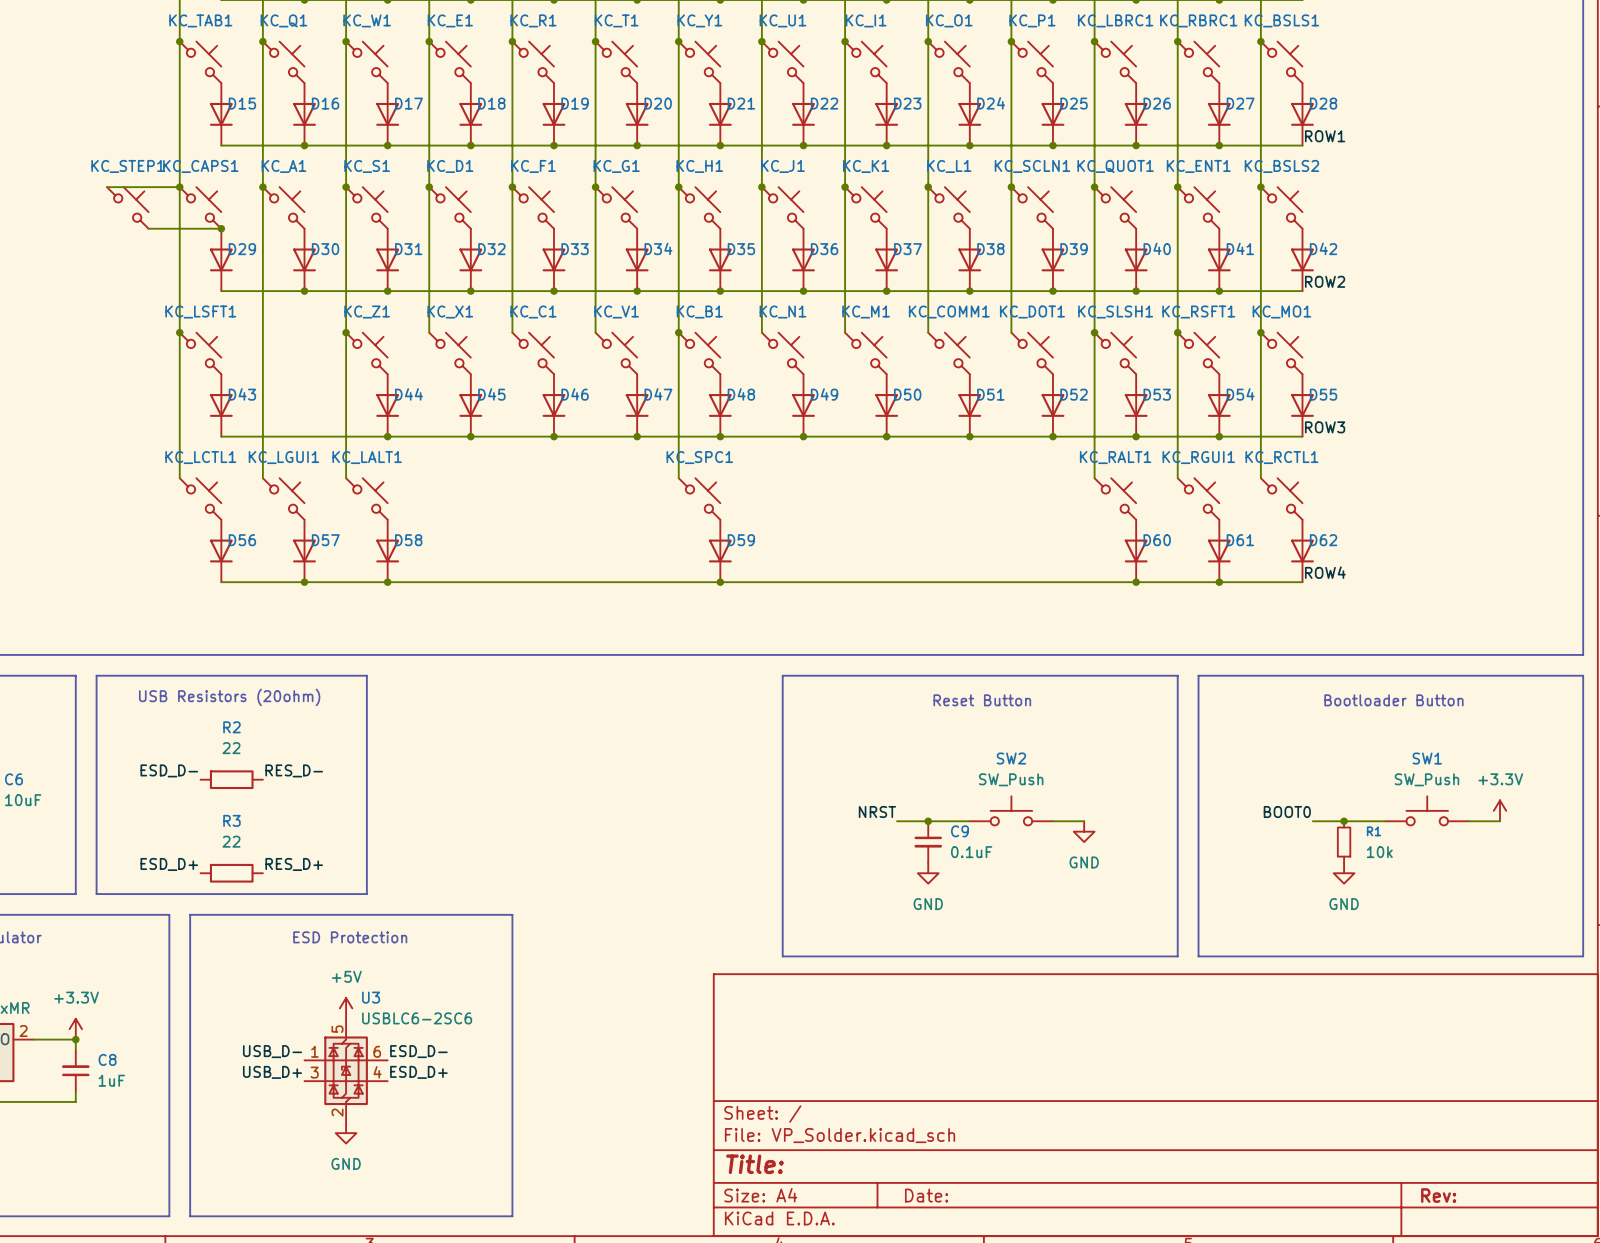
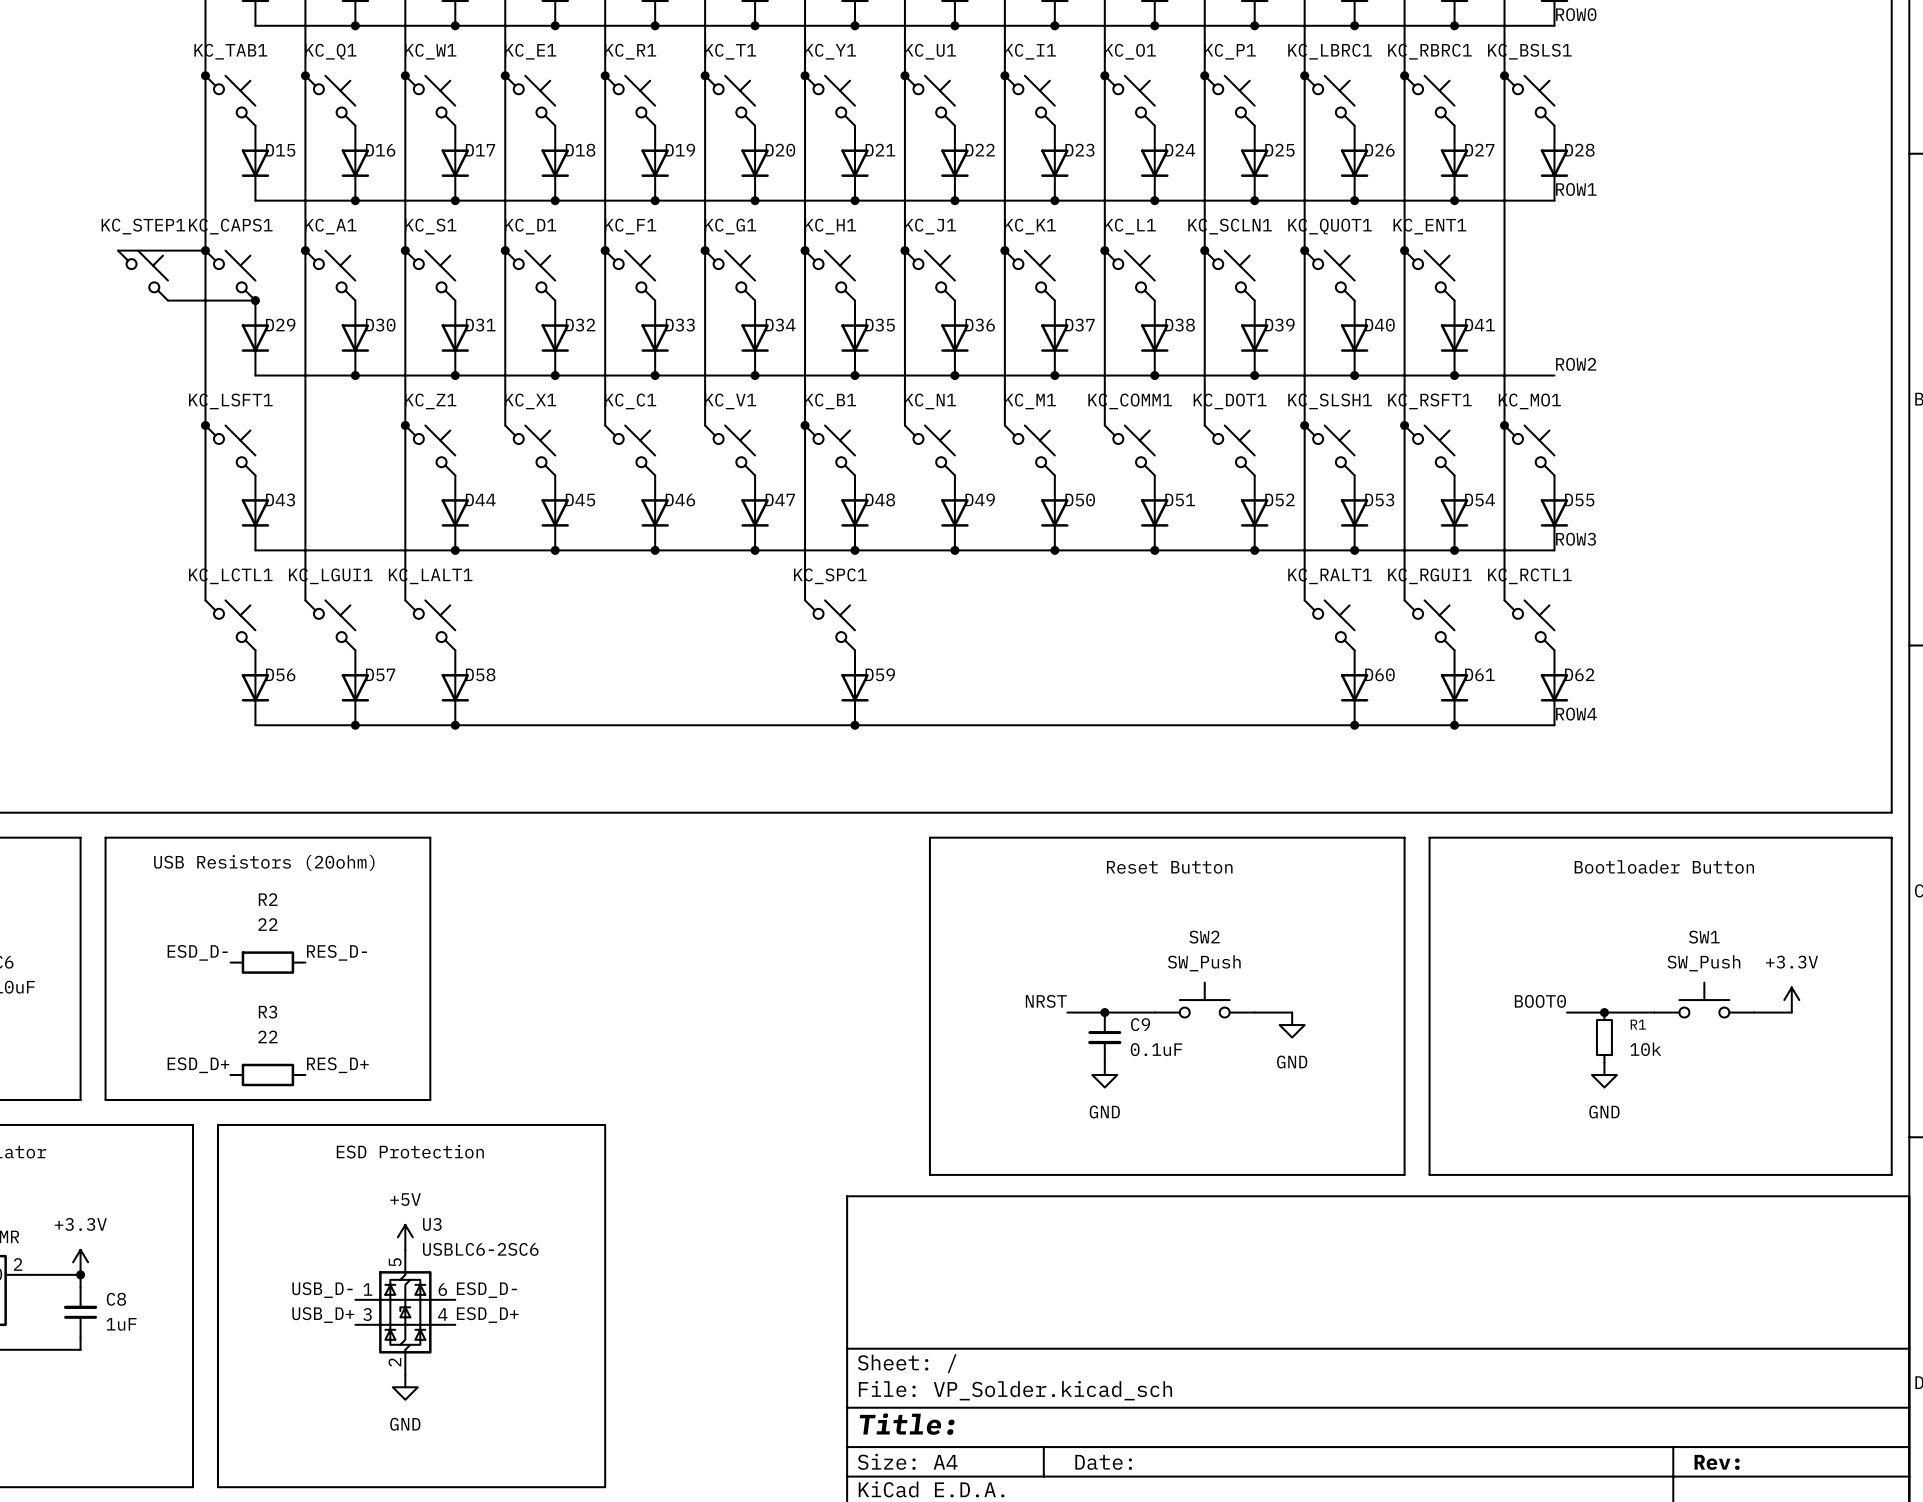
junction: (1260, 187) -> none
KC_BSLS2: (1281, 207) -> none
D42: (1302, 259) -> none

